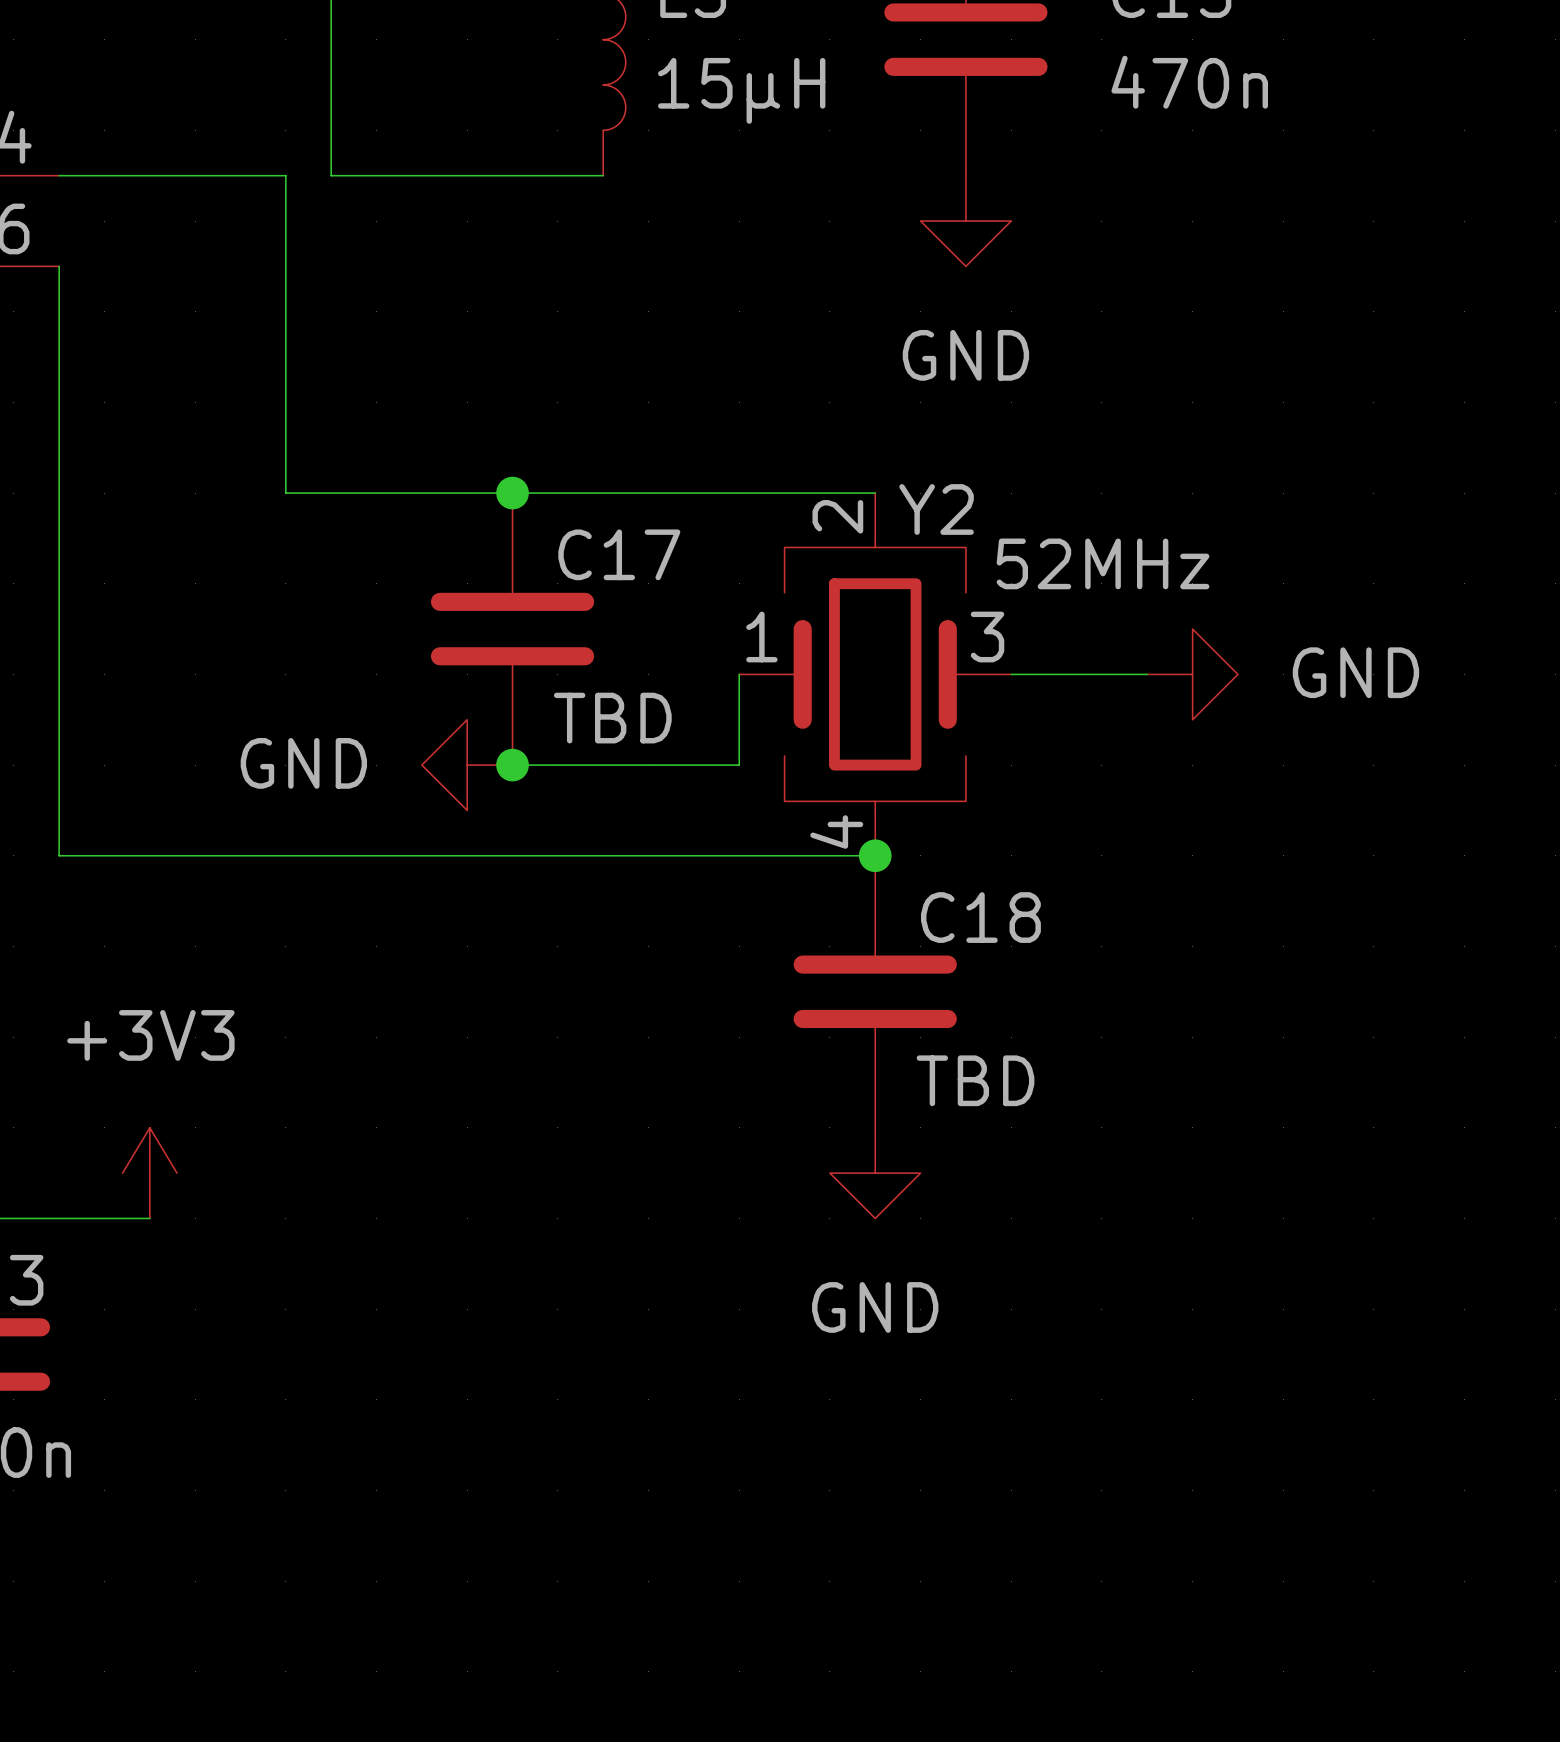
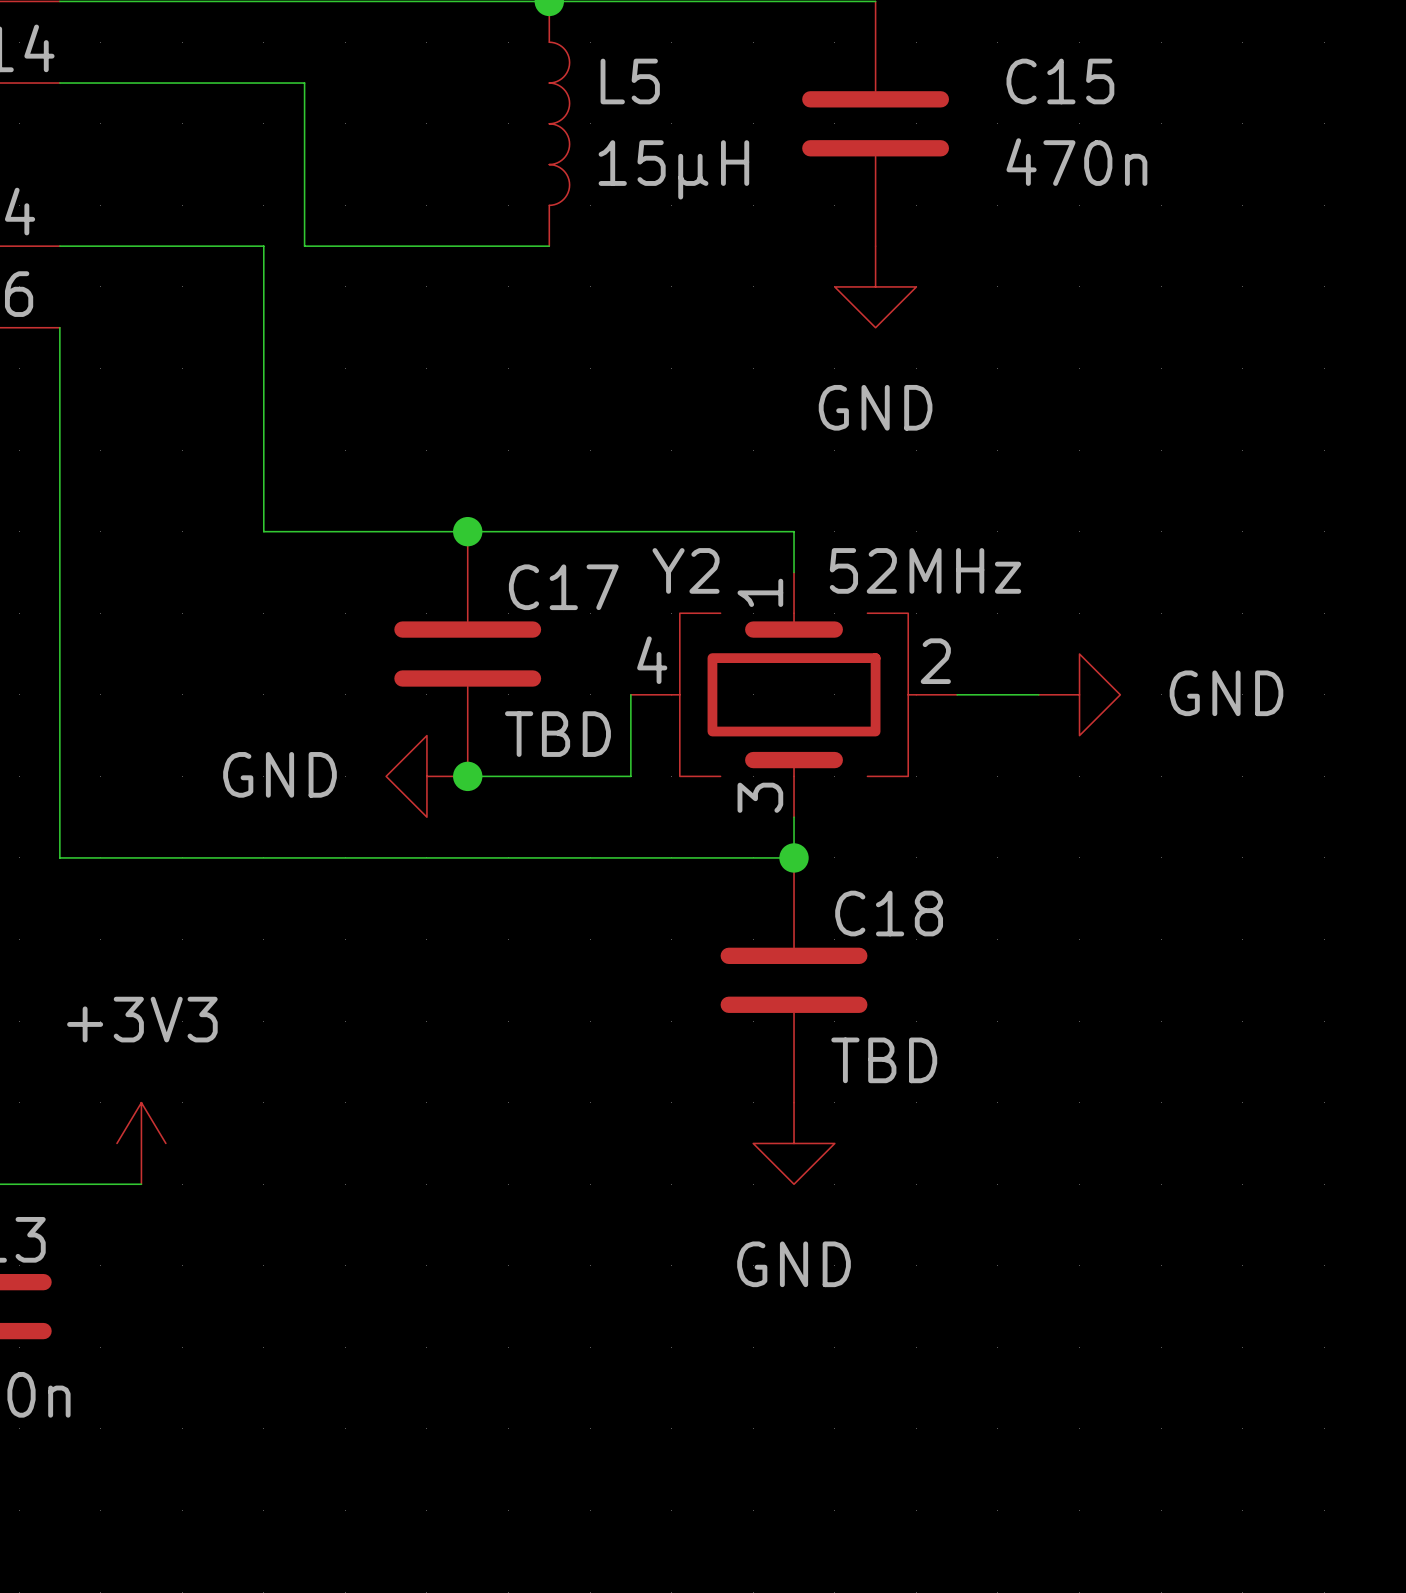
Y2 name position: Y2 (936, 509) -> Y2 (686, 570)
Y2 value position: 52MHz (1103, 563) -> 52MHz (925, 570)
wire: (739, 674) (739, 765) (693, 765) -> (630, 694) (630, 776)
Y2 rotation: 0° (875, 674) -> 90° clockwise (794, 694)

